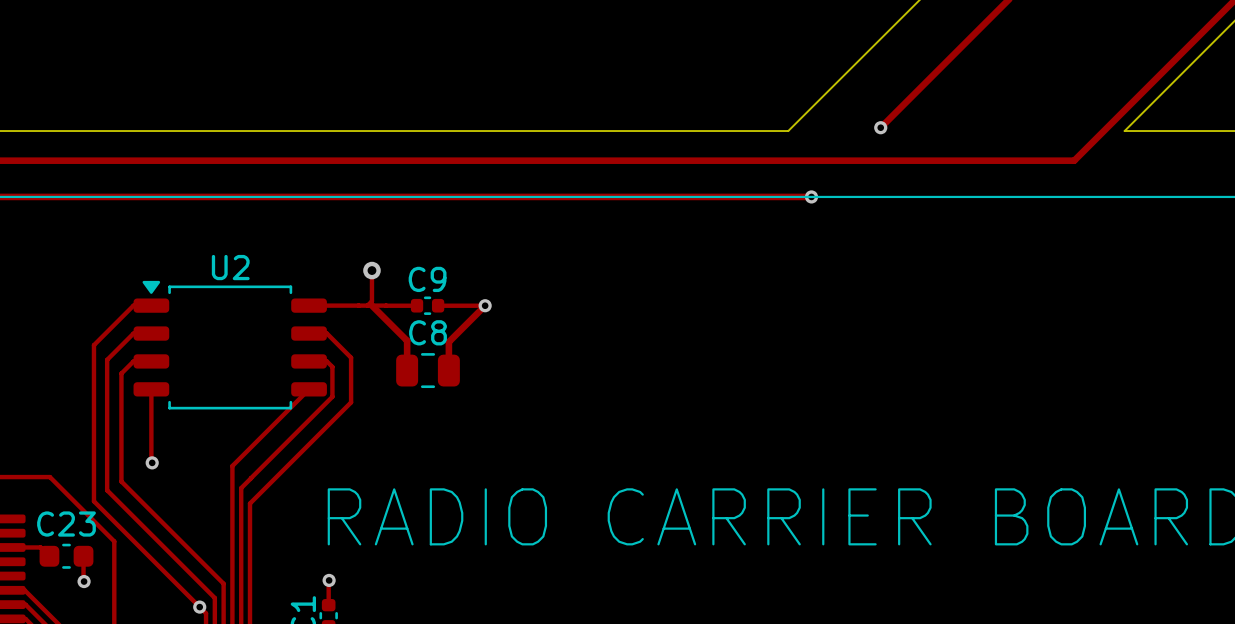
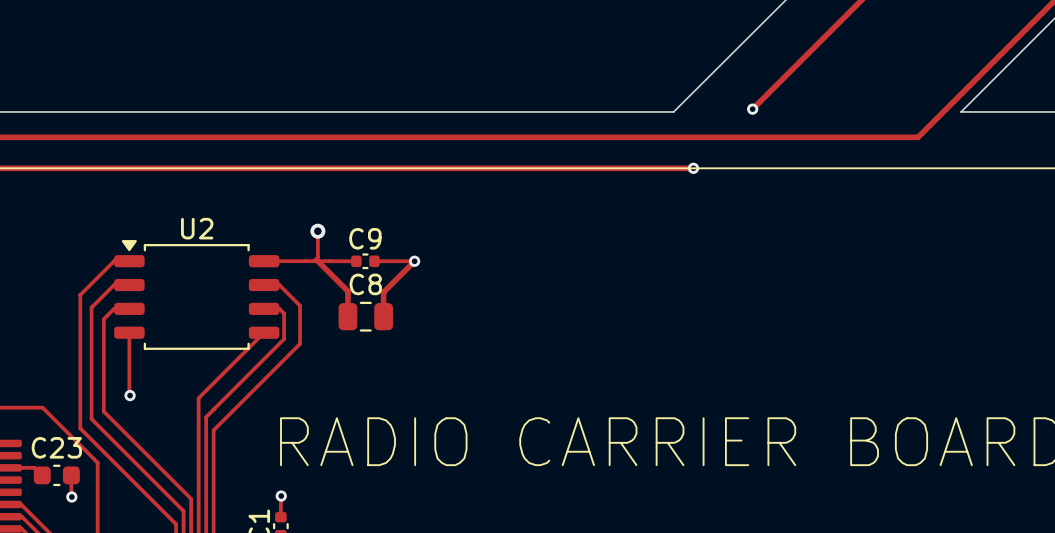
via: (199, 607) -> none

